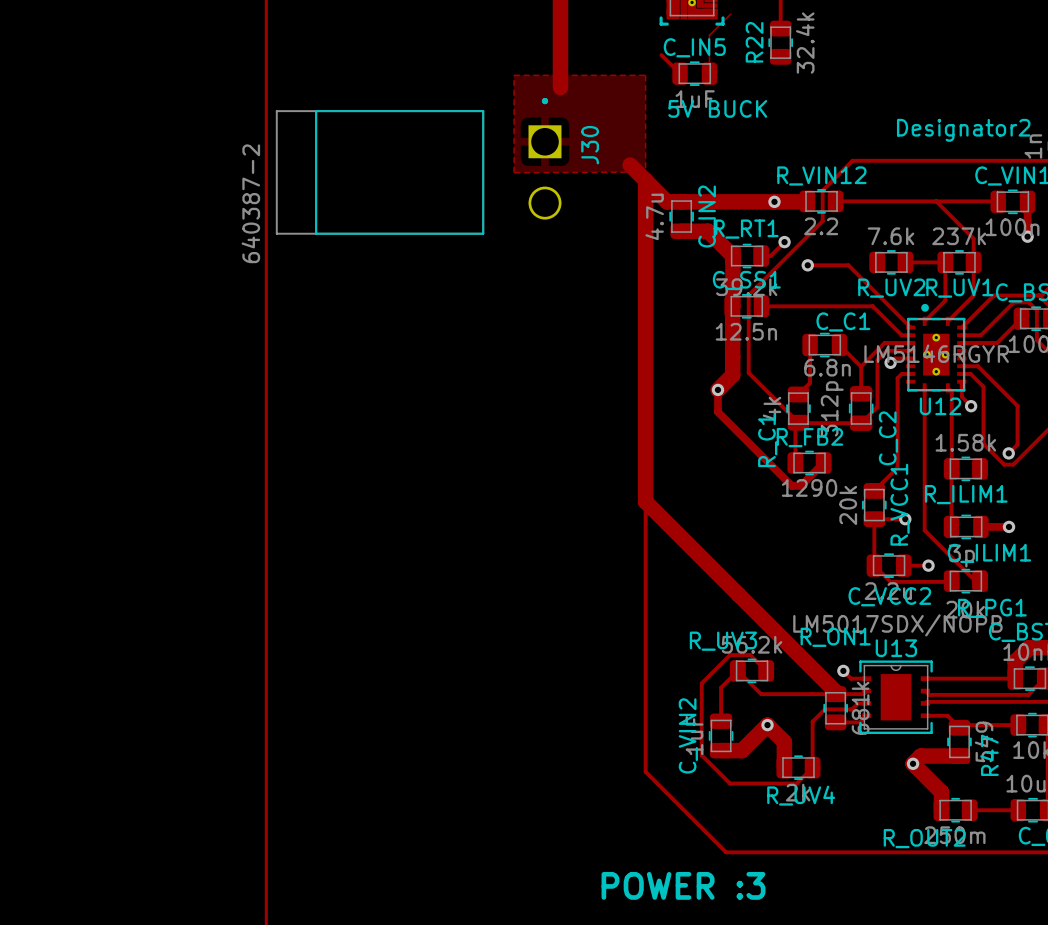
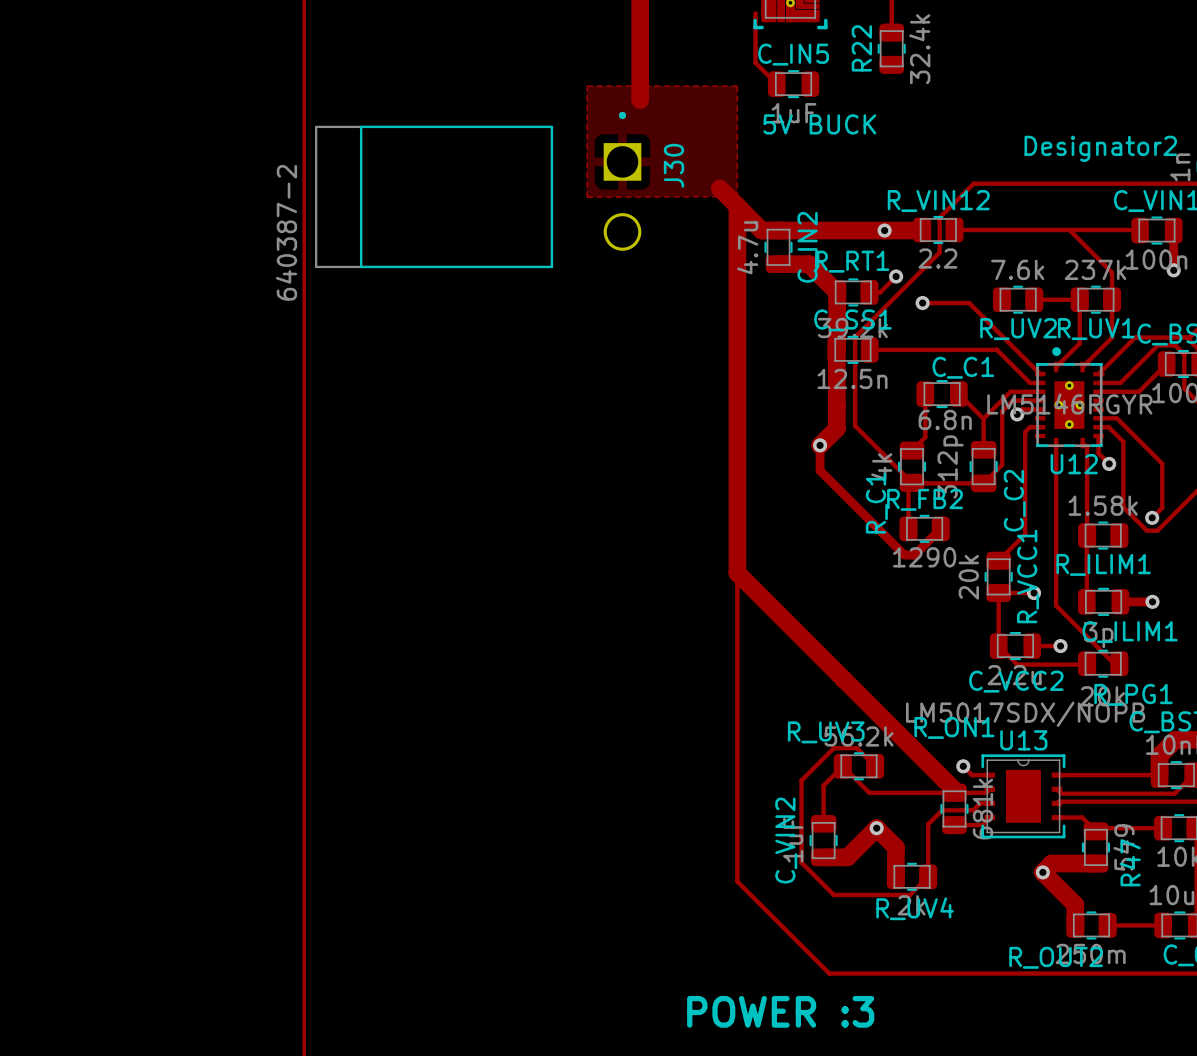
track: none -> (755, 13) (755, 62)
track: (730, 14) (709, 35) (709, 73) -> none

